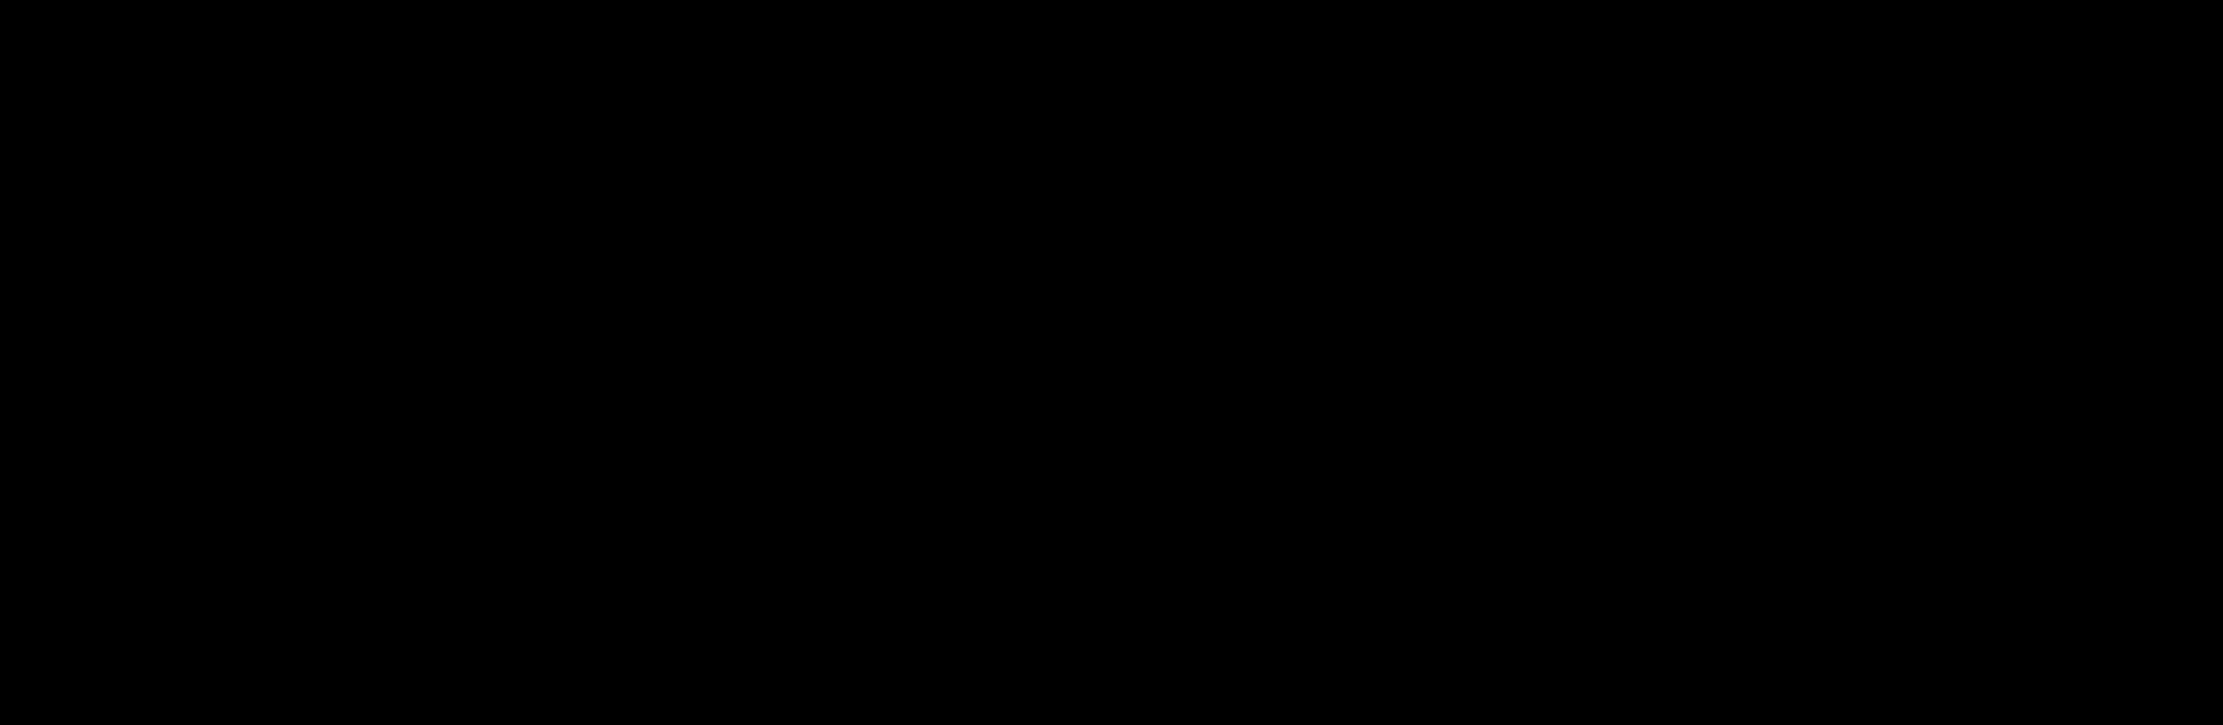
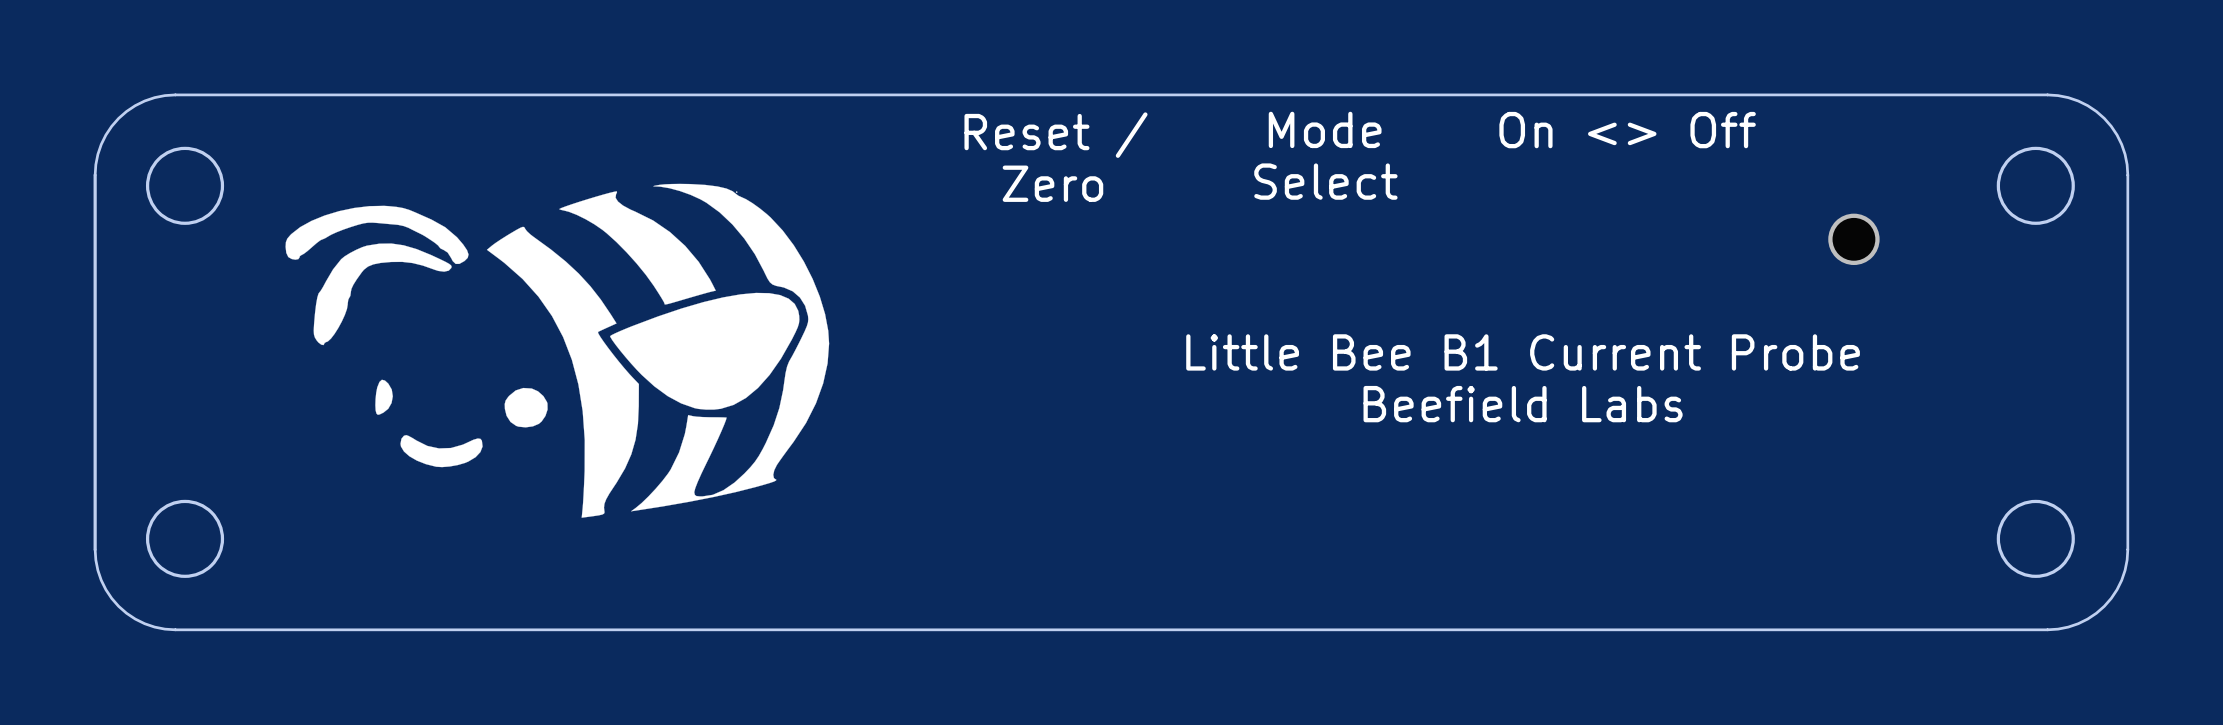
board edge: none -> (175, 94) (2047, 94) (2068, 97) (2096, 111) (2111, 126) (2121, 144) (2127, 164) (2127, 549) (2125, 570) (2111, 598) (2096, 613) (2078, 623) (2047, 629) (175, 629) (154, 627) (126, 613) (111, 598) (101, 580) (95, 560) (95, 175) (101, 144) (118, 118) (144, 101) (175, 94)
text: none -> Mode (1325, 129)
text: none -> On <> Off (1627, 130)
text: none -> Reset / (1056, 135)
round board edge: none -> [145, 146, 225, 225]
round board edge: none -> [1996, 146, 2075, 225]
text: none -> Select (1325, 181)
drawing: none -> [285, 183, 830, 518]
text: none -> Zero (1052, 183)
via: none -> (1853, 239)
text: none -> Little Bee B1 Current Probe (1523, 352)
text: none -> Beefield Labs (1523, 404)
round board edge: none -> [145, 499, 225, 578]
round board edge: none -> [1996, 499, 2075, 578]

